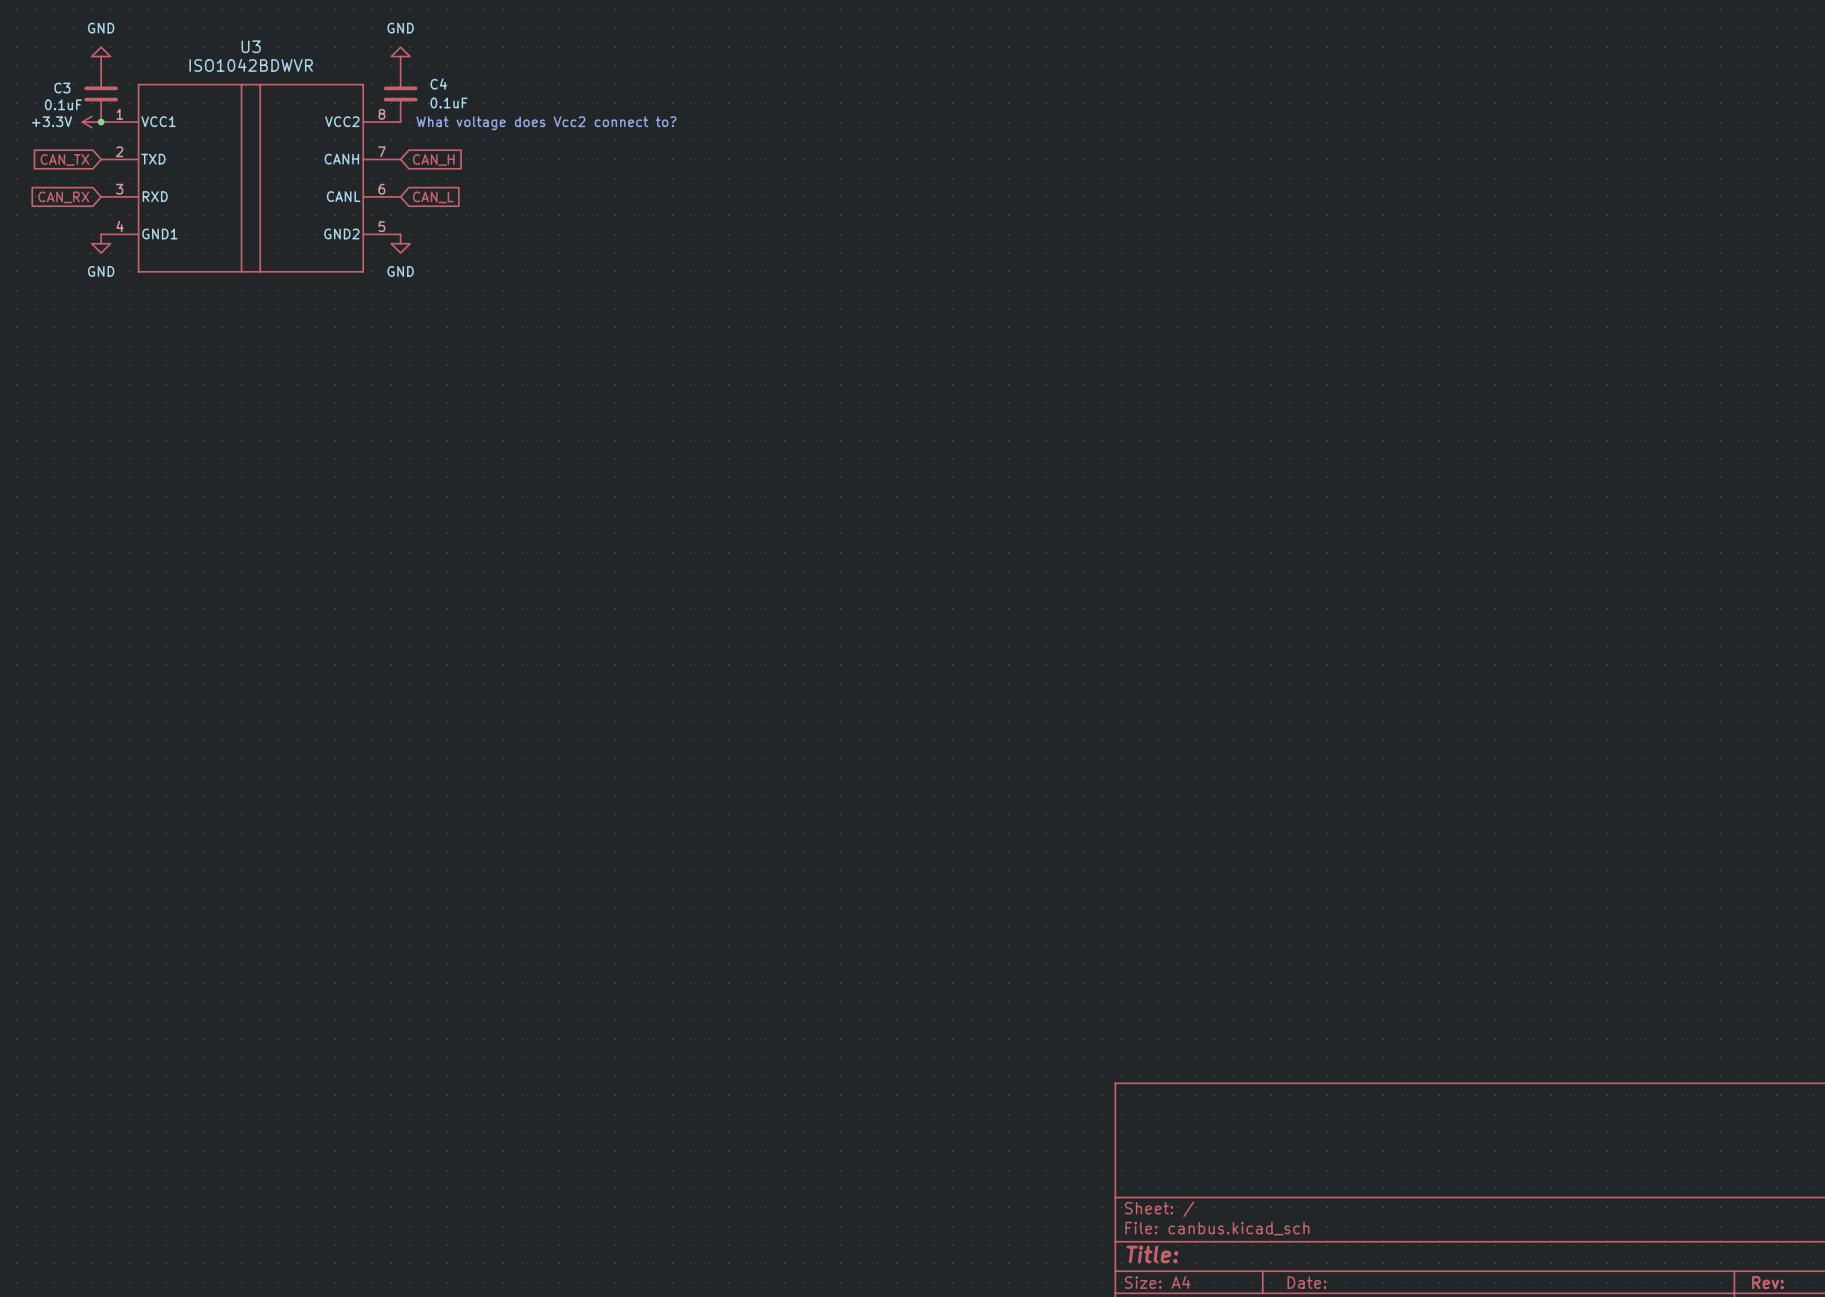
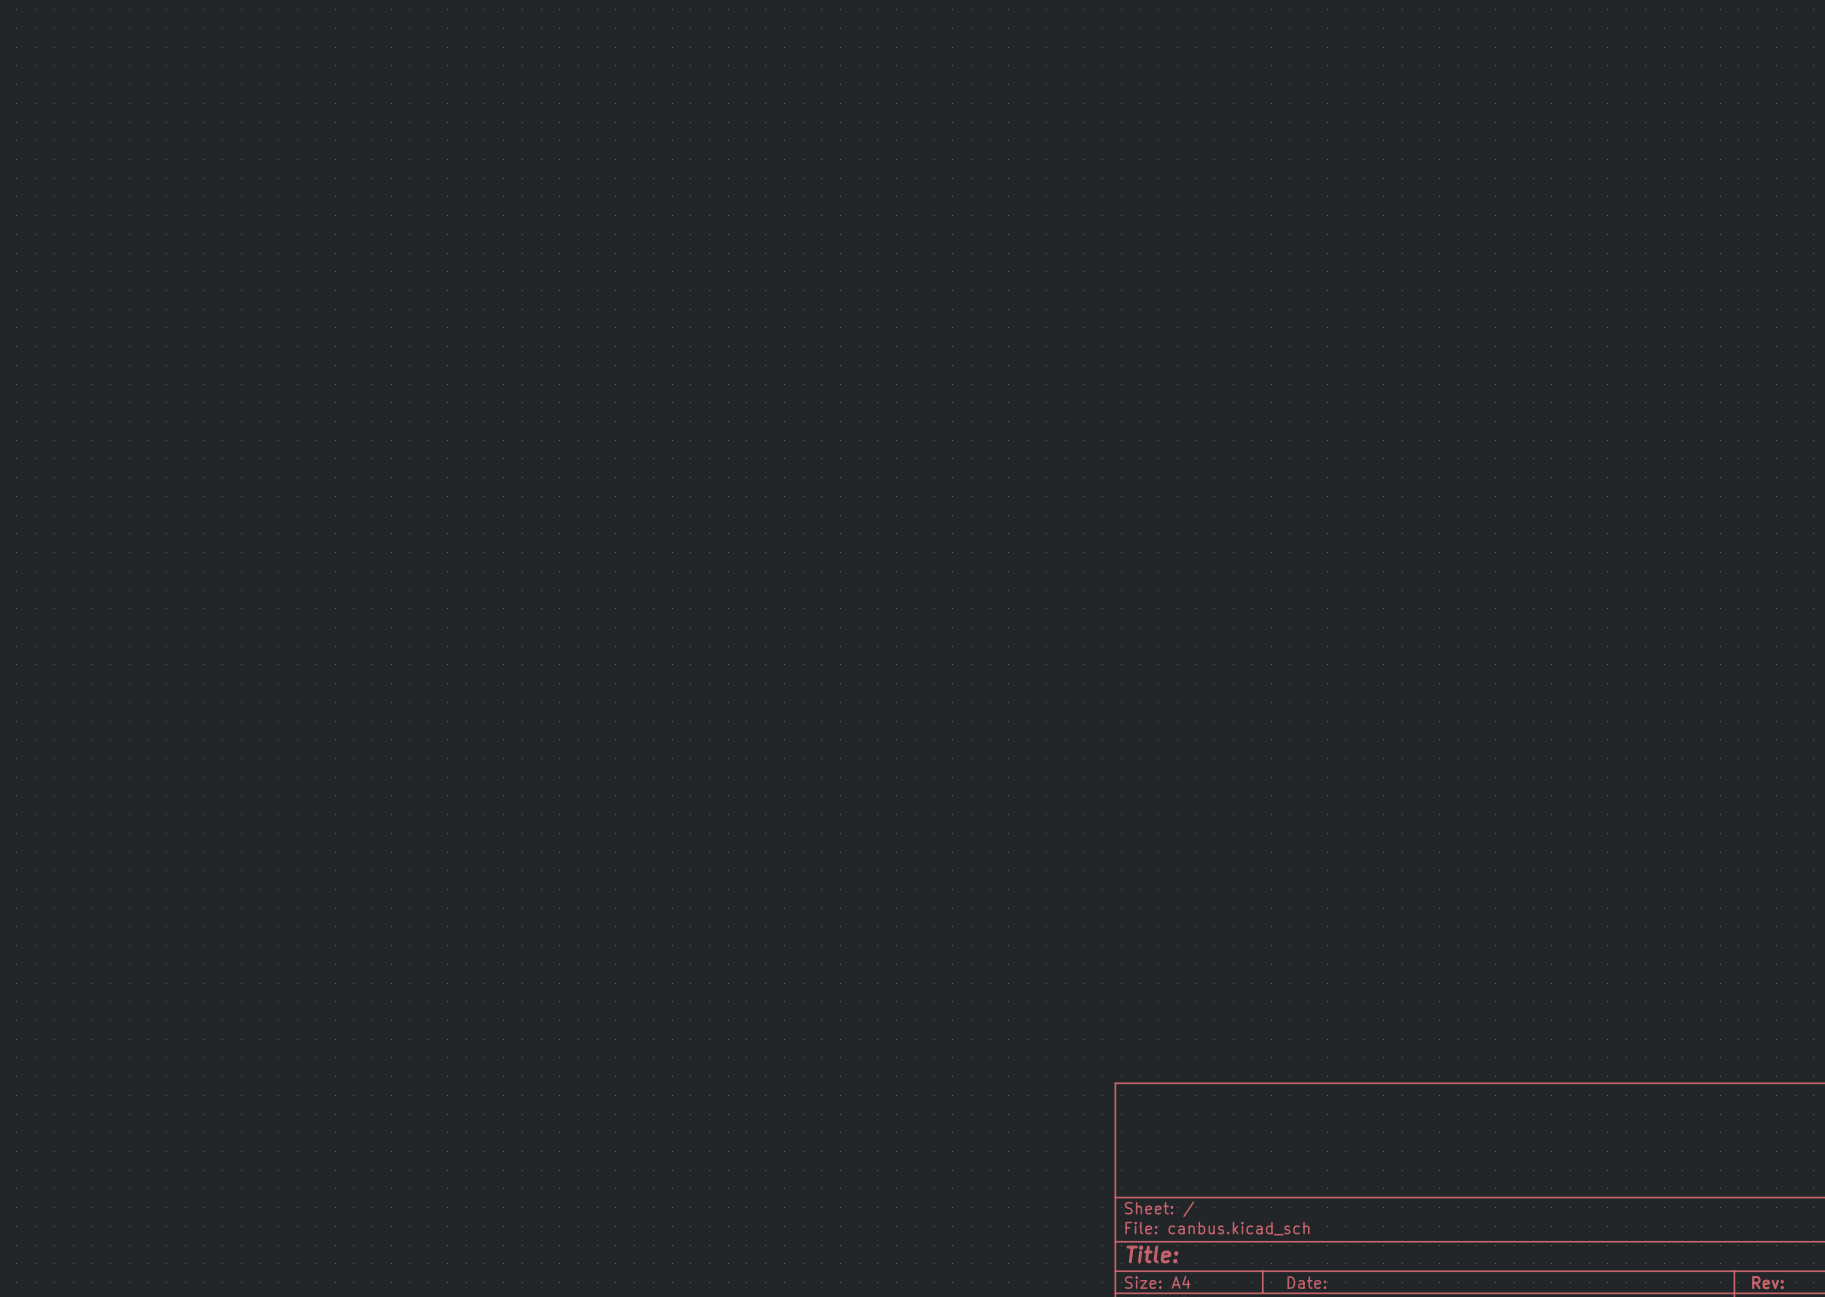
power symbol: GND (101, 56) -> none
power symbol: GND (400, 56) -> none
C3: 0.1uF (101, 93) -> none
C4: 0.1uF (400, 93) -> none
power symbol: +3.3V (91, 122) -> none
junction: (101, 122) -> none
text: What voltage does Vcc2 connect to? (546, 123) -> none
global label: CAN_TX (64, 159) -> none
global label: CAN_H (433, 159) -> none
U3: ISO1042BDWVR (250, 178) -> none
global label: CAN_RX (63, 197) -> none
global label: CAN_L (433, 197) -> none
power symbol: GND (101, 243) -> none
power symbol: GND (400, 243) -> none

